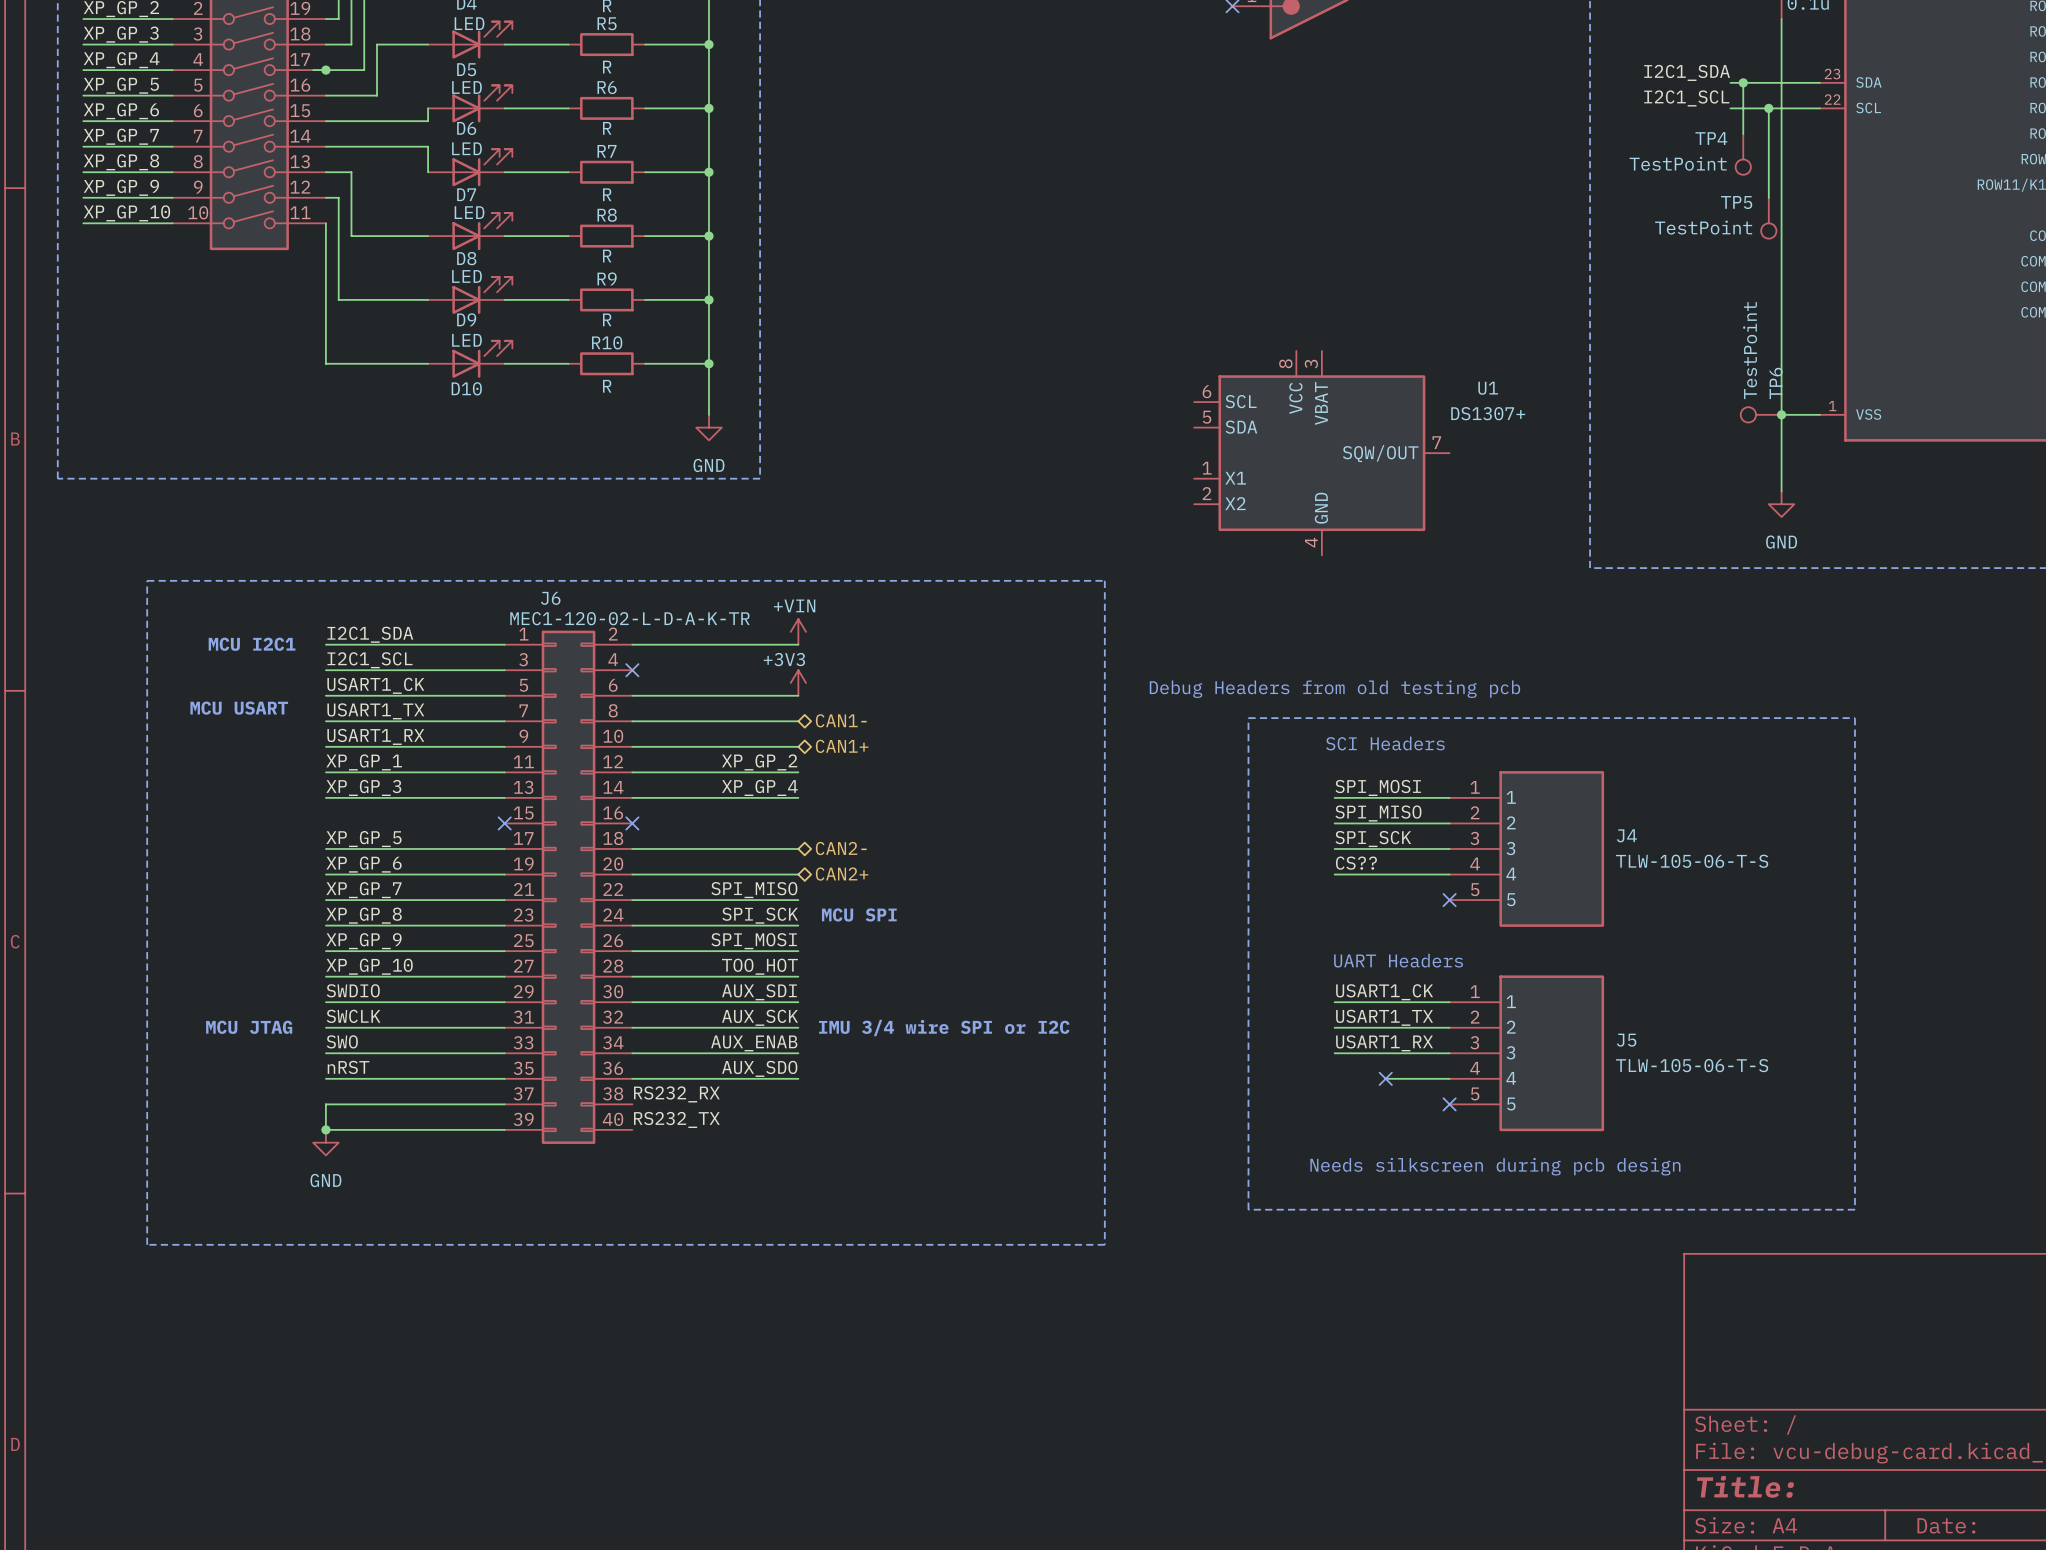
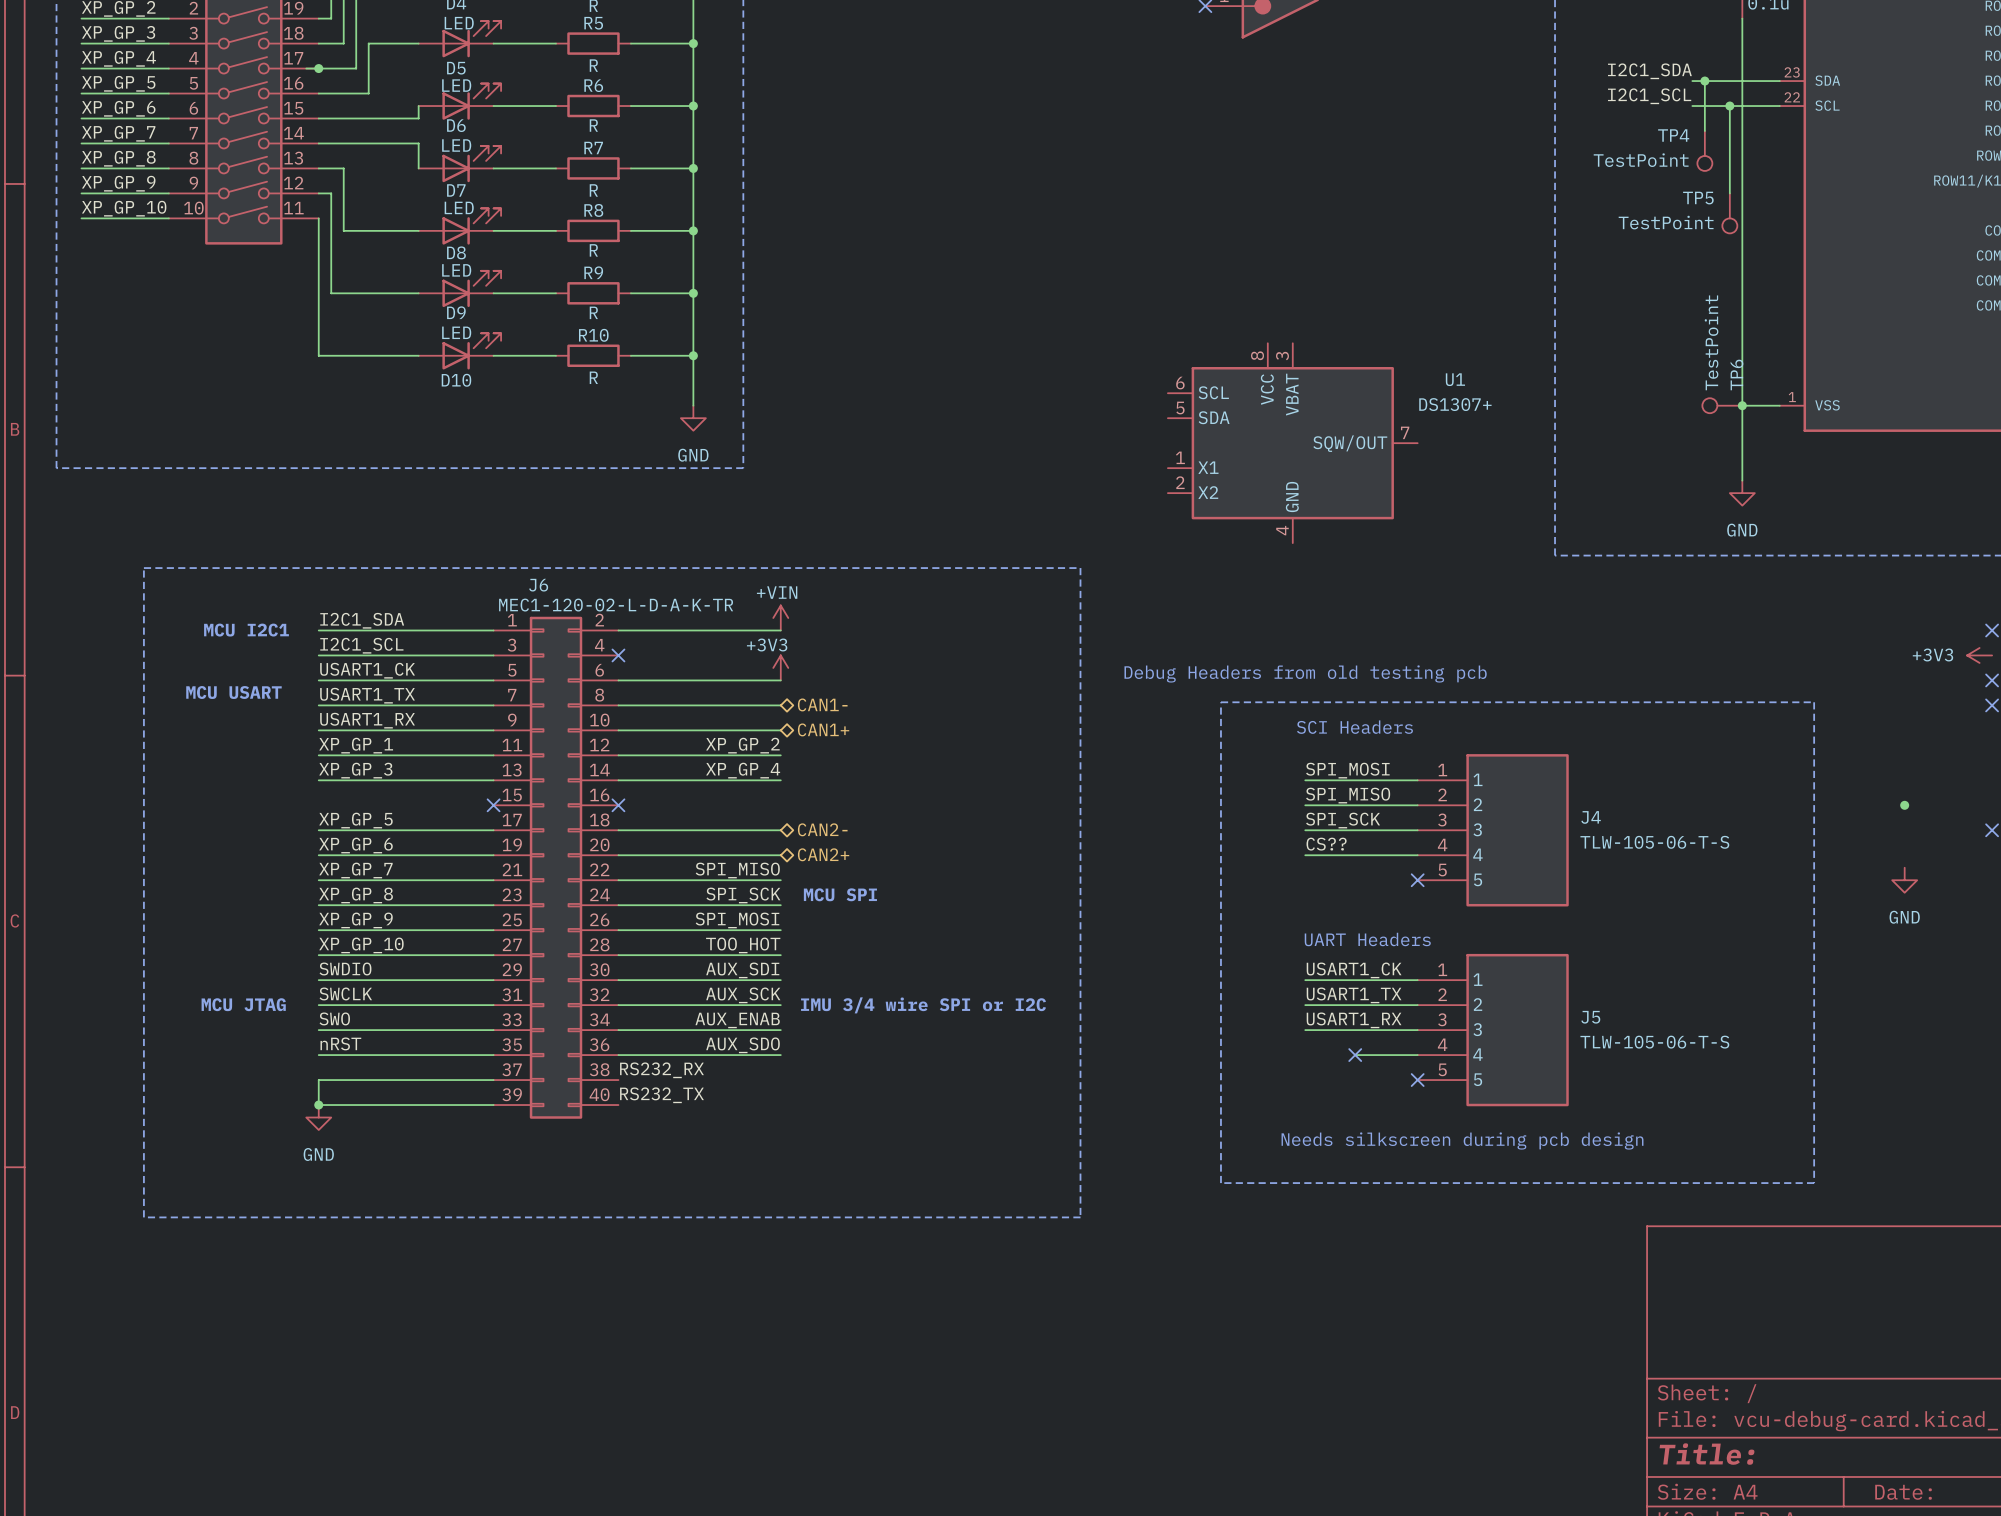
no-connect mark: none -> (1992, 630)
power symbol: none -> +3V3 (1979, 655)
no-connect mark: none -> (1992, 680)
no-connect mark: none -> (1992, 705)
junction: none -> (1904, 805)
no-connect mark: none -> (1992, 830)
power symbol: none -> GND (1904, 880)

